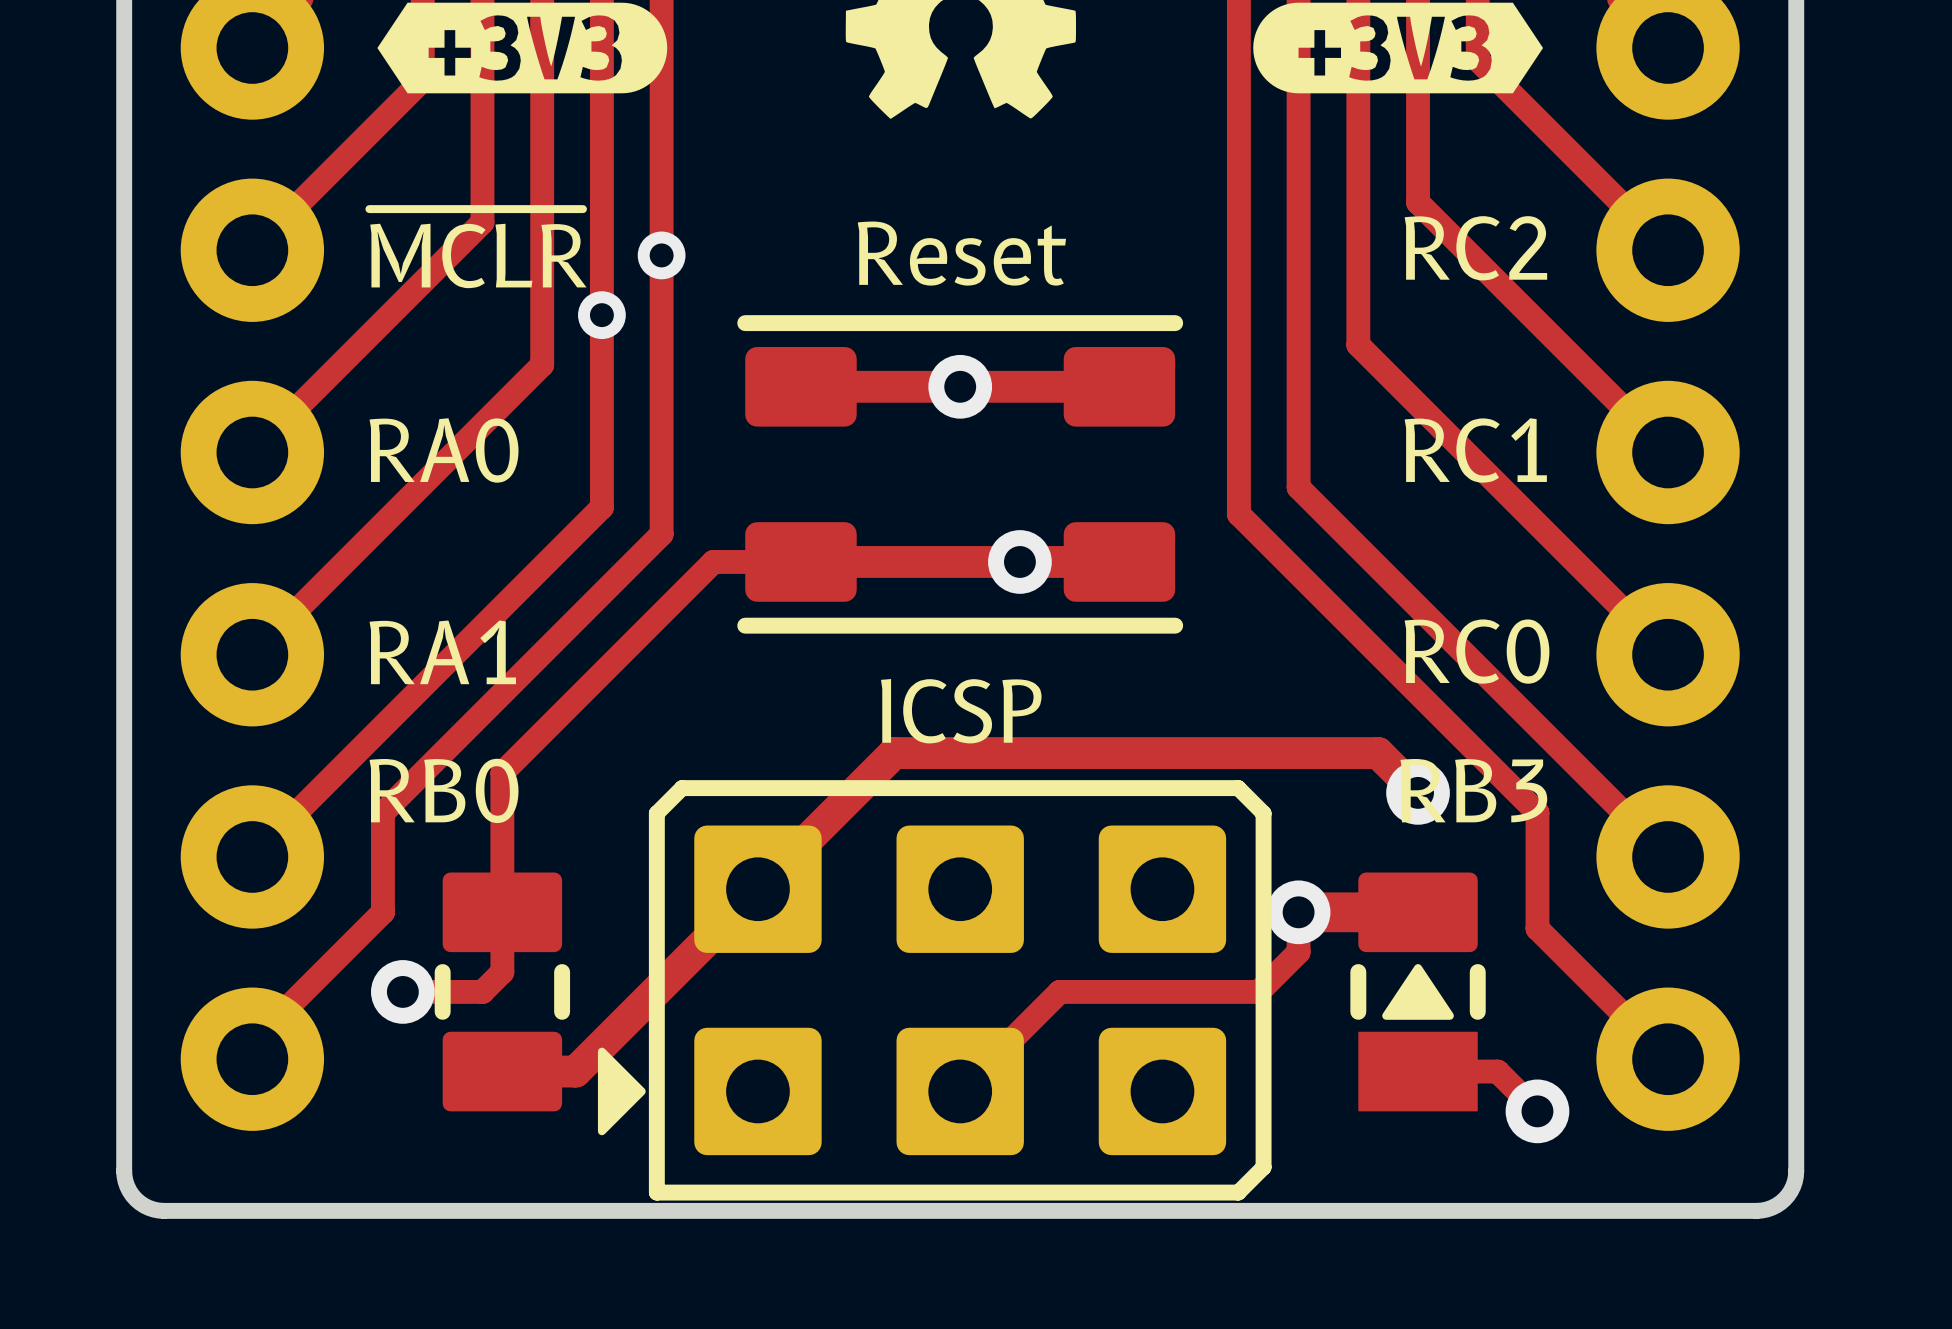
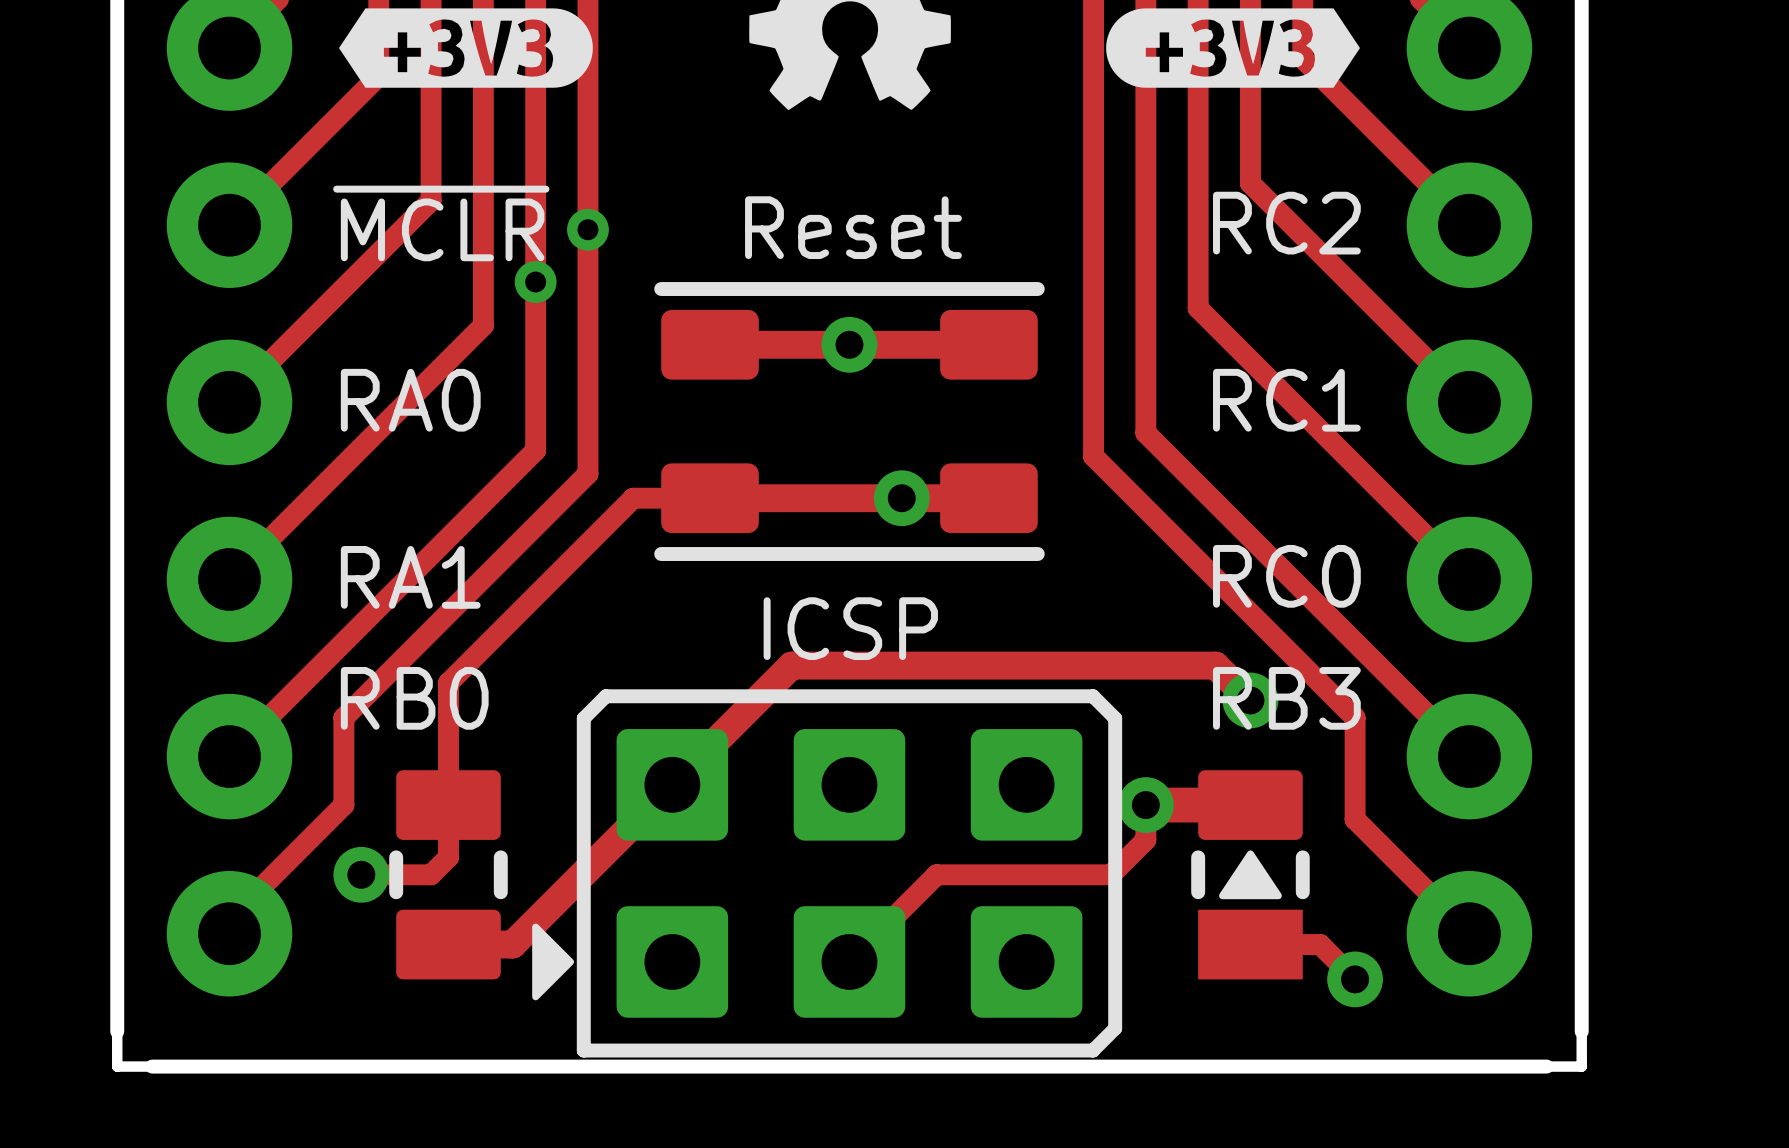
board edge: (124, 1171) (127, 1186) (135, 1199) (148, 1207) (163, 1210) -> (117, 1031) (117, 1066) (152, 1066)
board edge: (1796, 1171) (1793, 1186) (1784, 1199) (1771, 1207) (1756, 1210) -> (1581, 1031) (1581, 1066) (1546, 1066)

